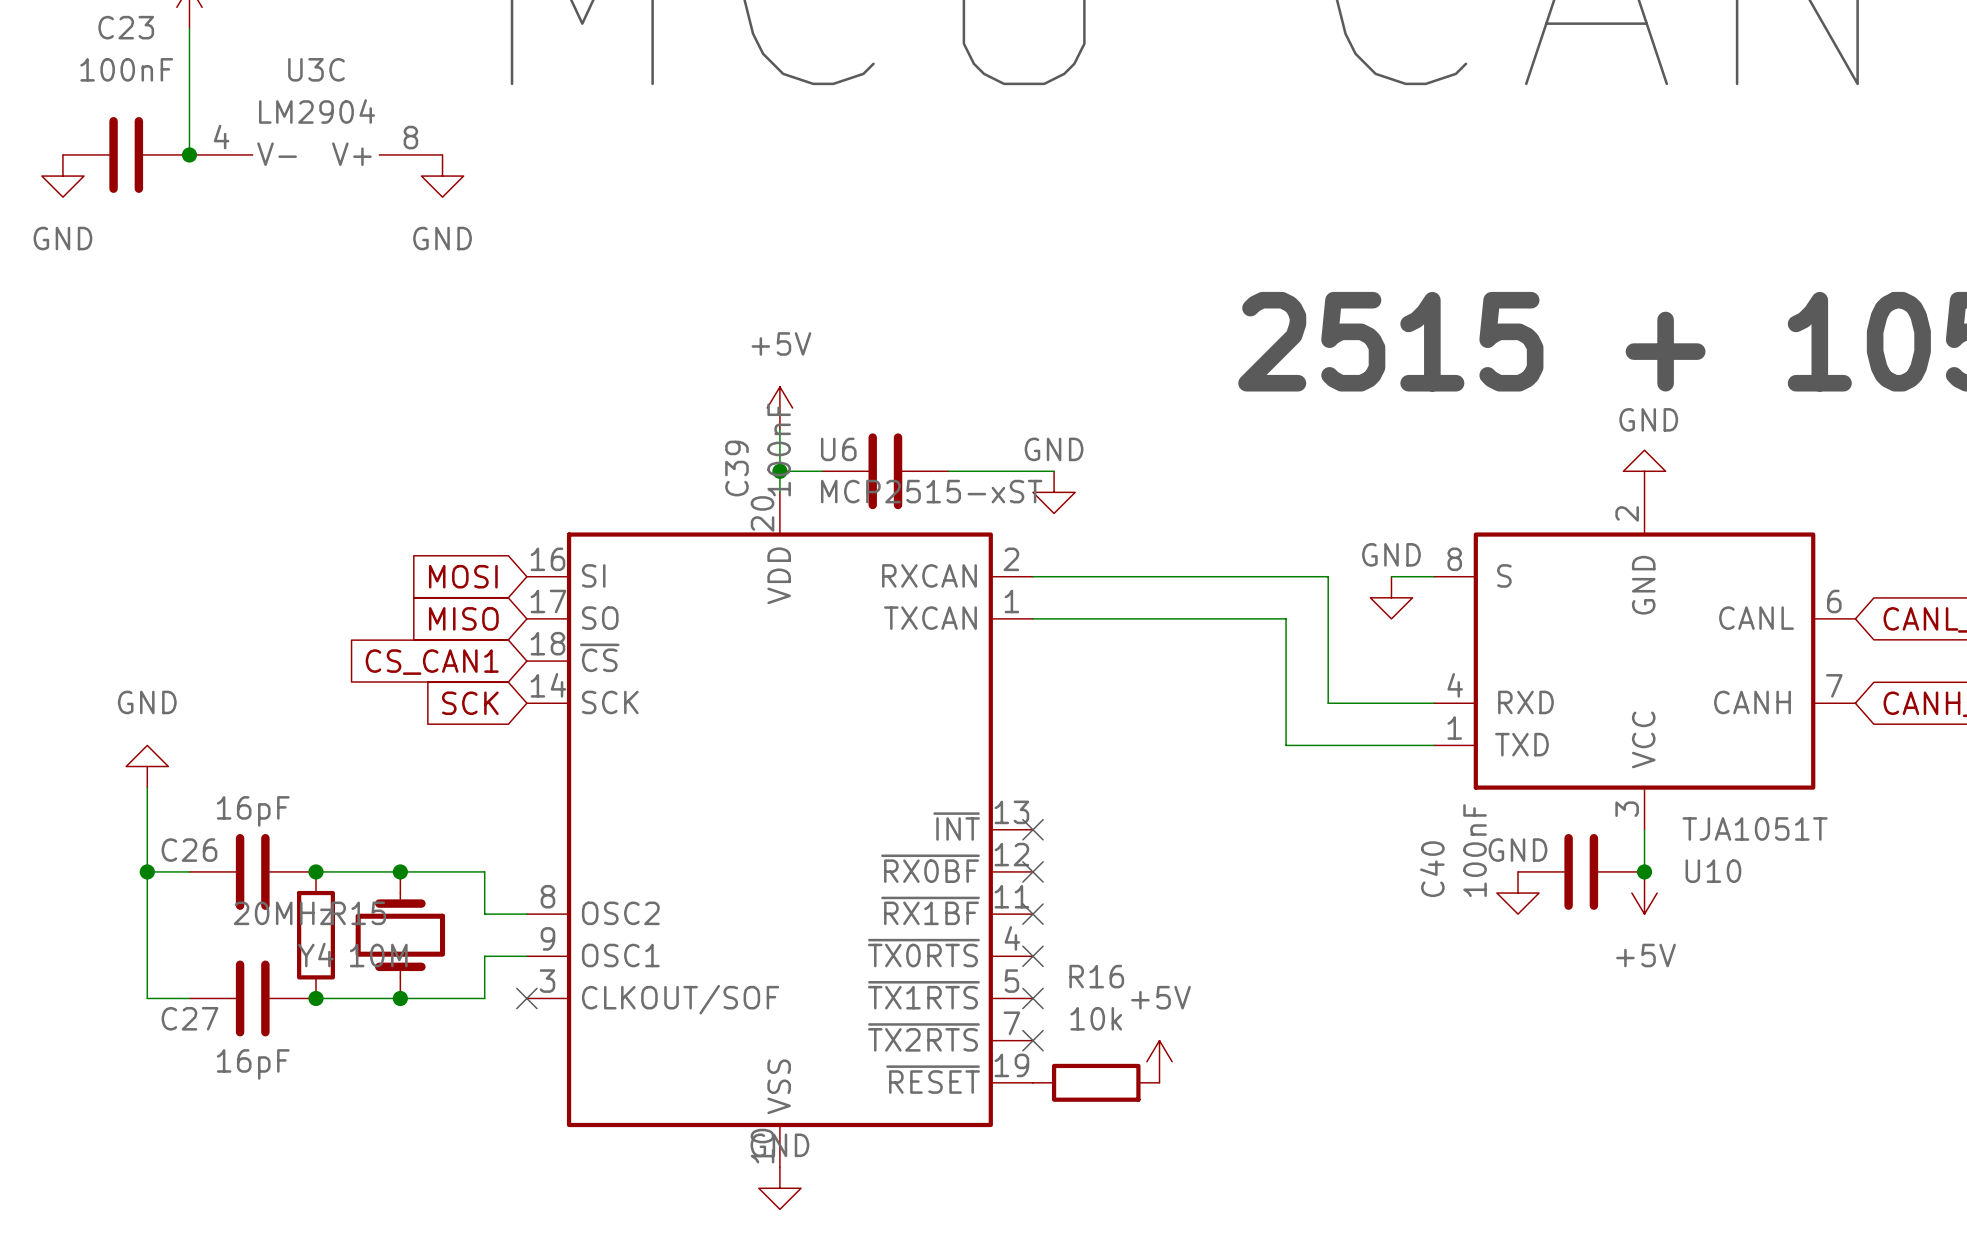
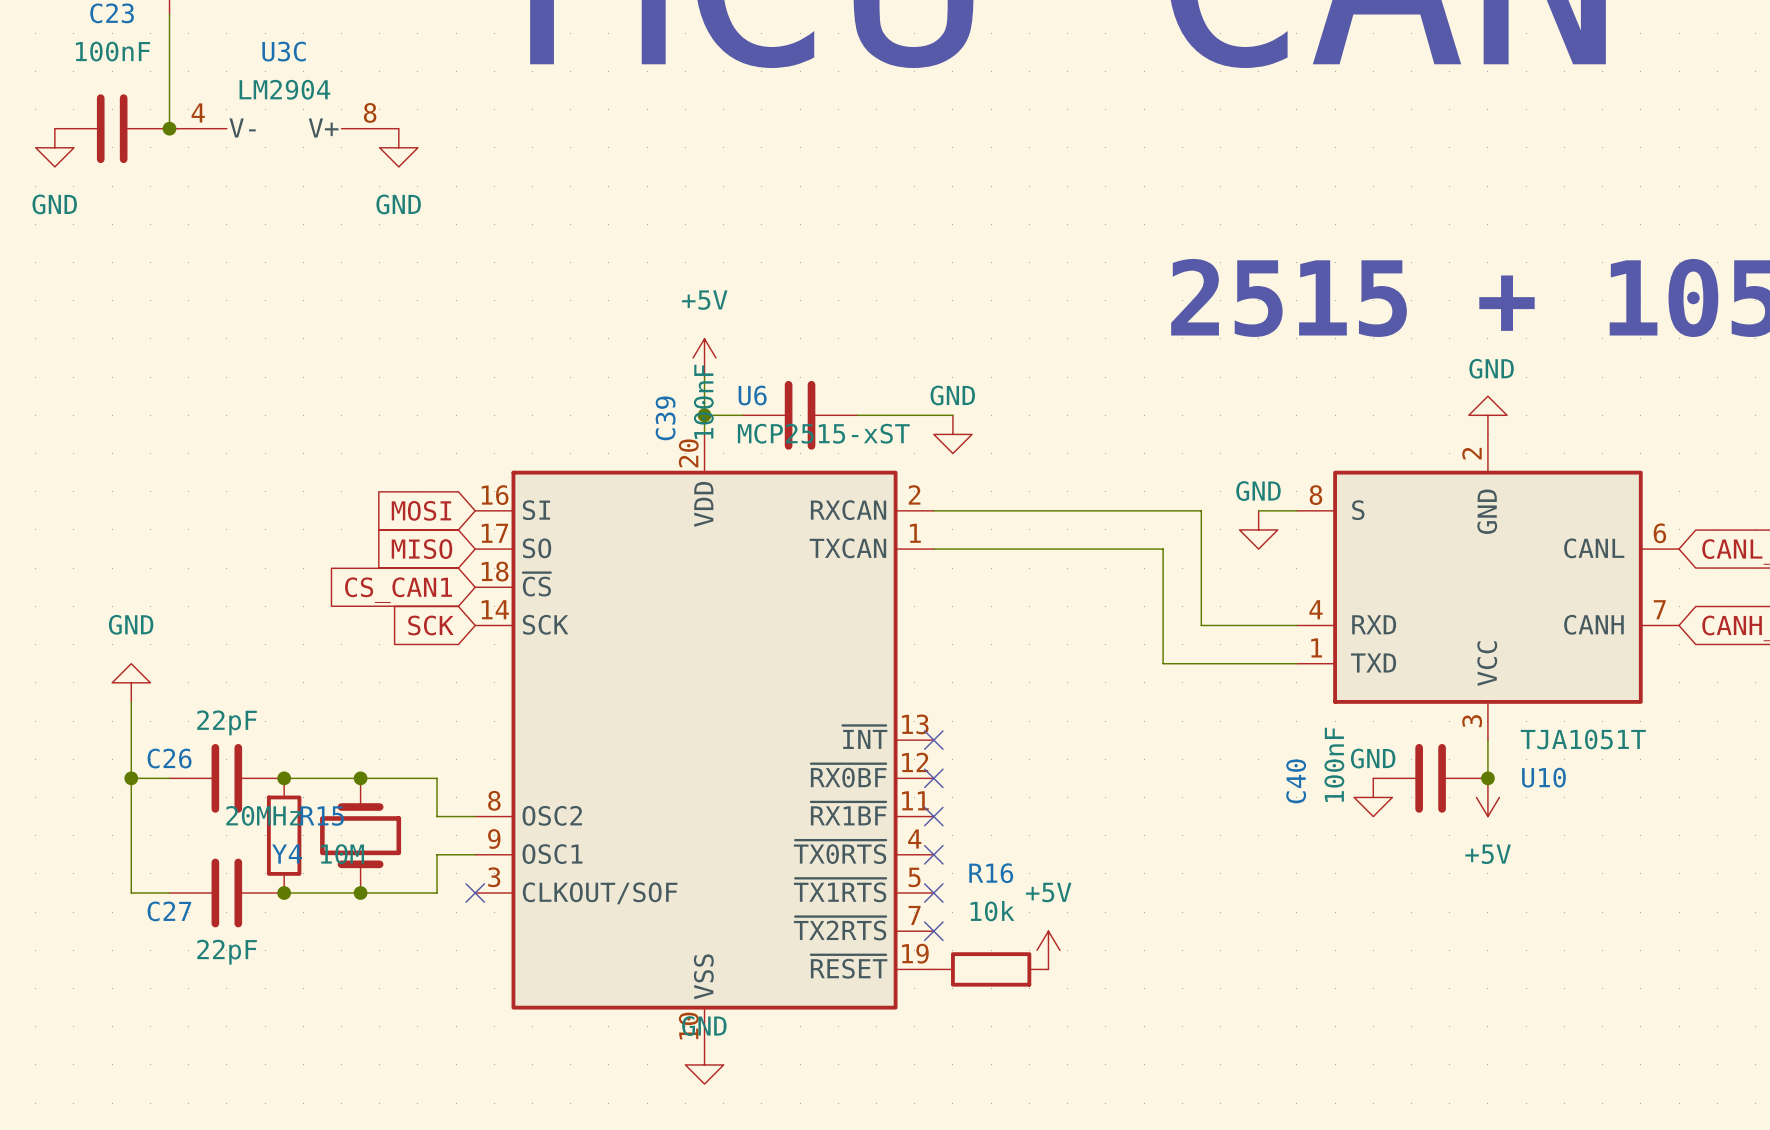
C26 value: 16pF (253, 811) -> 22pF (227, 722)
C27 value: 16pF (253, 1064) -> 22pF (227, 952)

